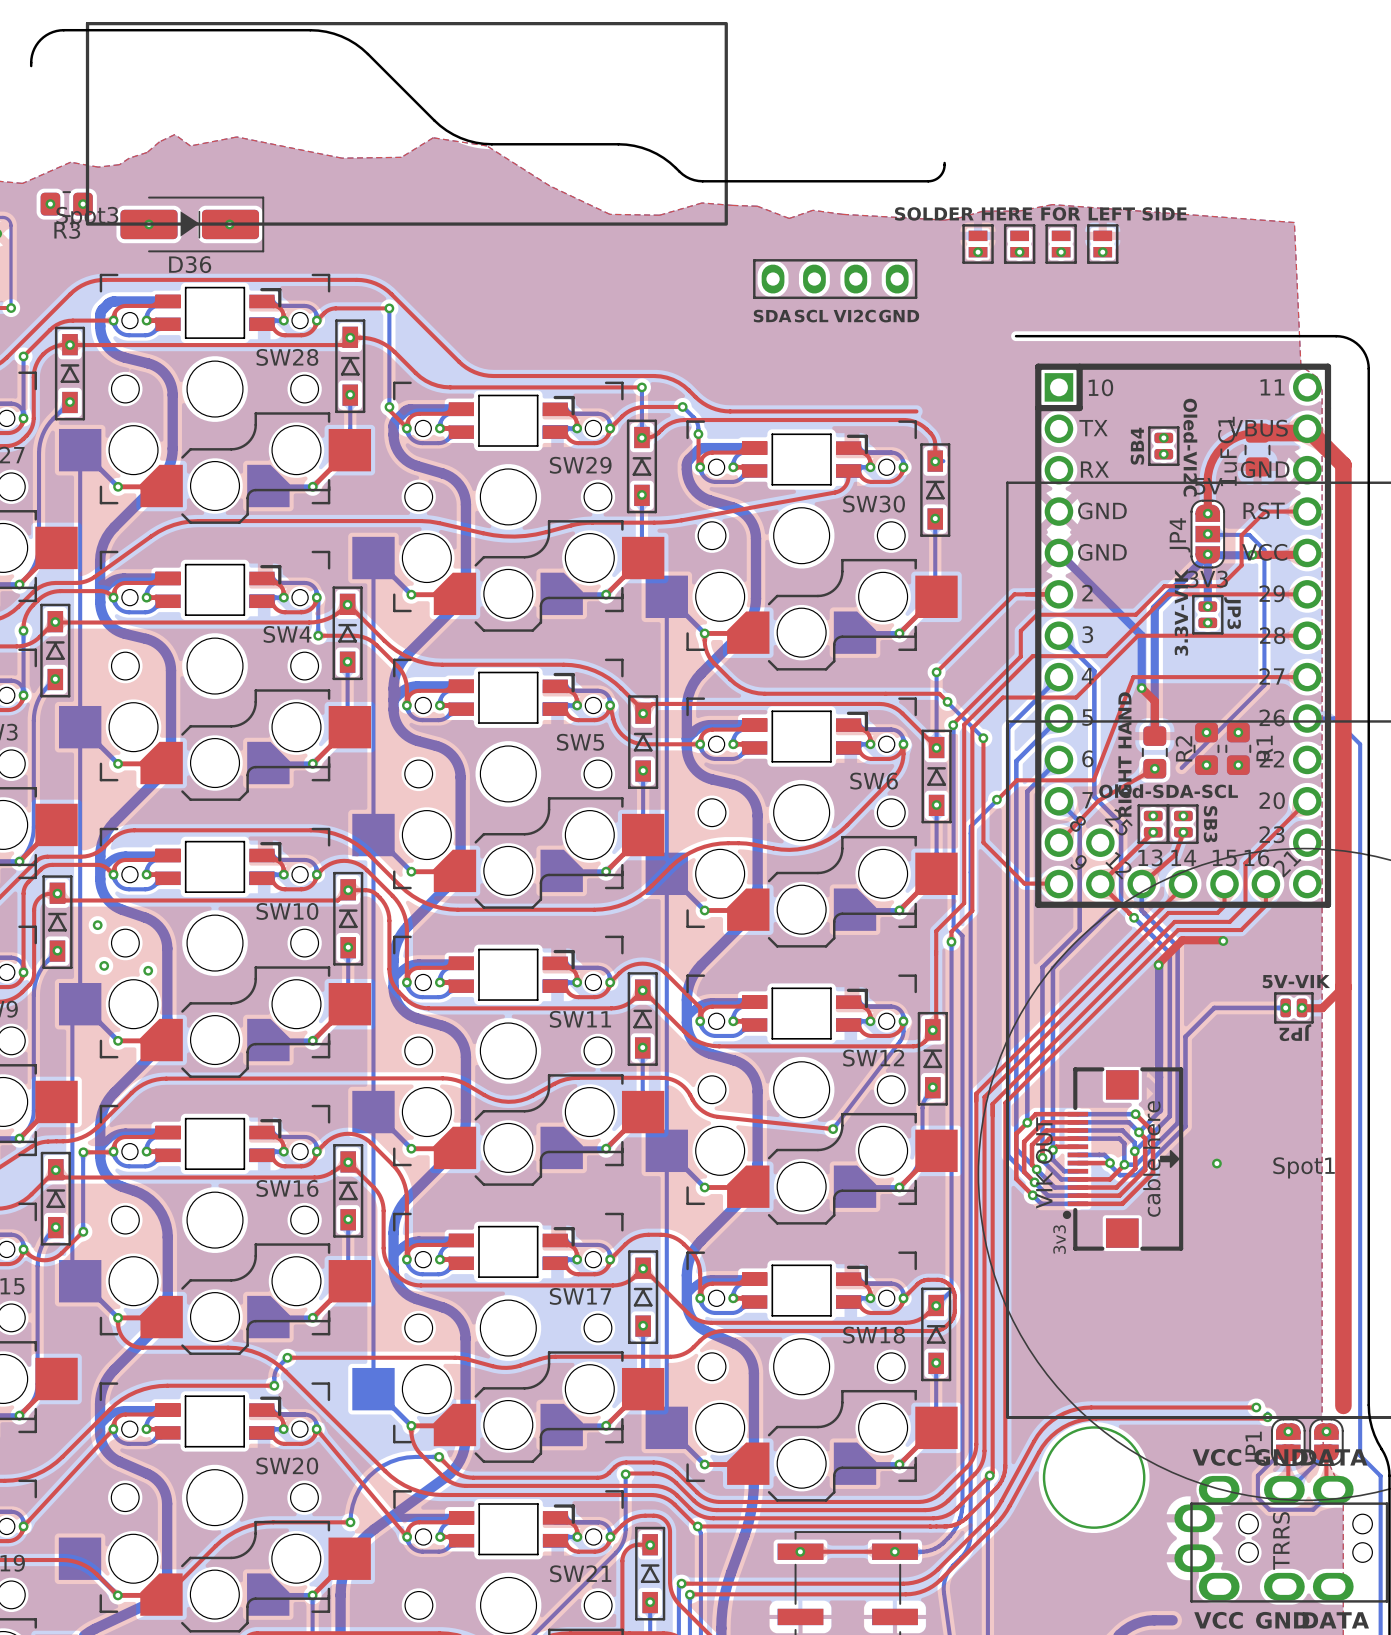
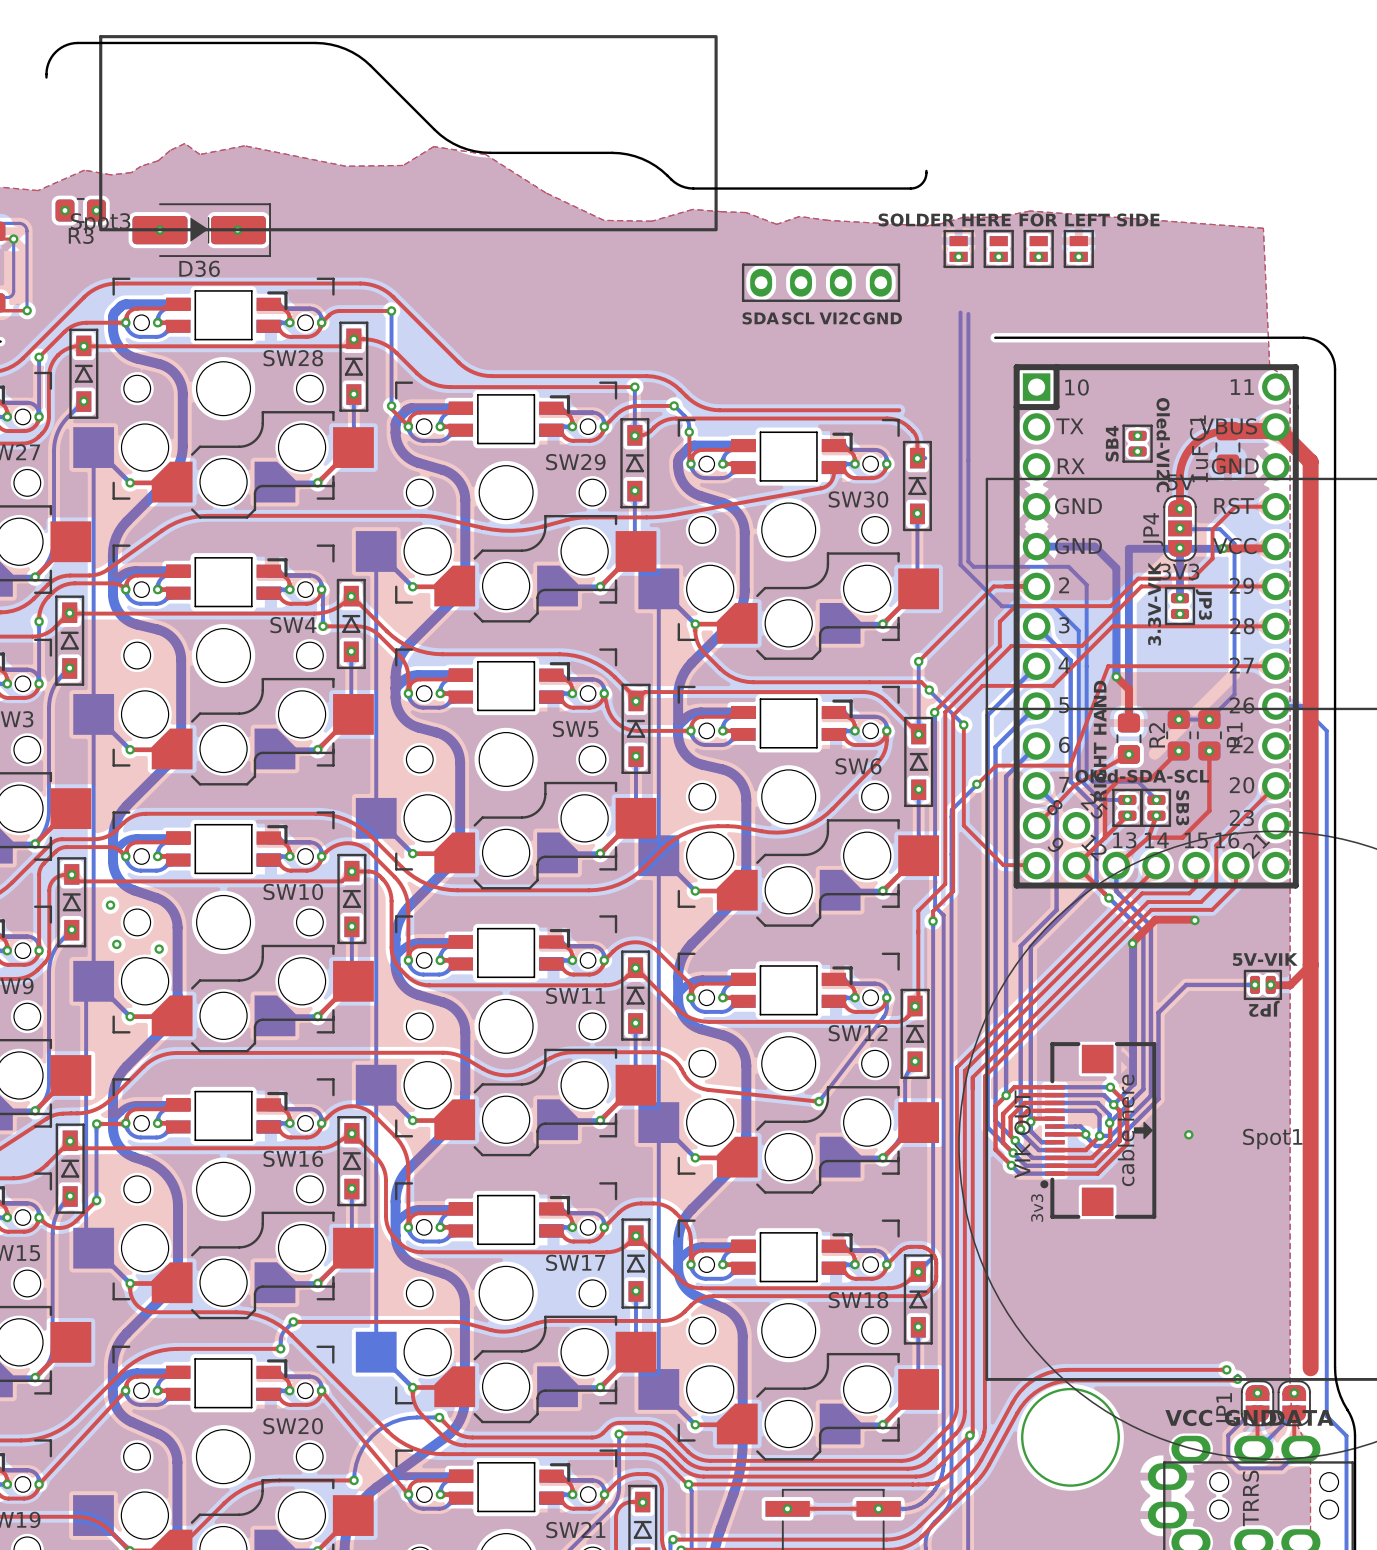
bottom track: none -> (960, 312) (960, 564) (1001, 606) (1054, 606) (1078, 630) (1078, 778) (1100, 799) (1127, 799)
bottom track: none -> (968, 313) (968, 561) (973, 566) (1068, 566) (1086, 584) (1086, 775) (1093, 781) (1138, 781) (1156, 799)
bottom track: (1058, 552) (1141, 635) -> (1036, 546) (1094, 546) (1116, 568) (1116, 626)
bottom track: (1207, 555) (1154, 608) -> (1179, 548) (1128, 548) (1128, 599)
bottom track: (1264, 685) (1181, 767) -> (1234, 674) (1234, 694) (1209, 719) (1178, 719)
top track: none -> (1178, 751) (1150, 779) (1119, 779) (1105, 793) (1105, 837)
top track: none -> (1209, 751) (1209, 810) (1182, 837) (1148, 837)

